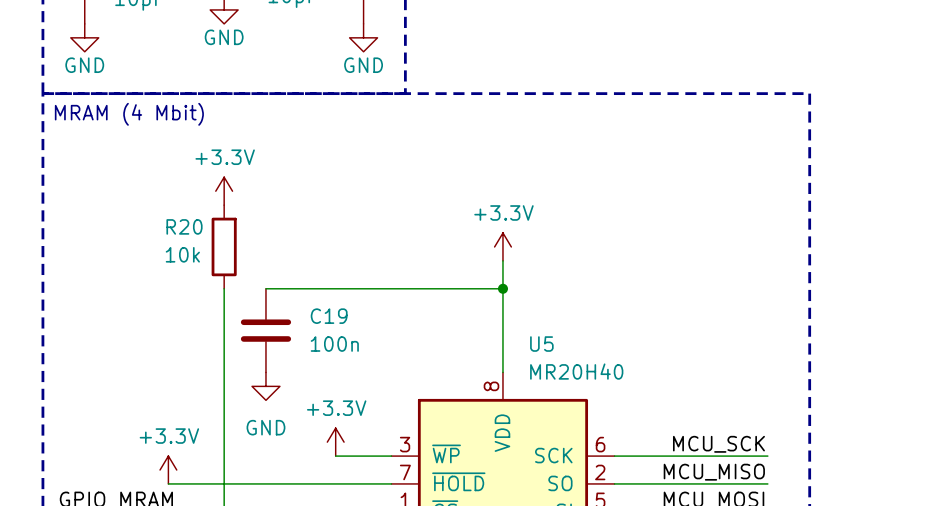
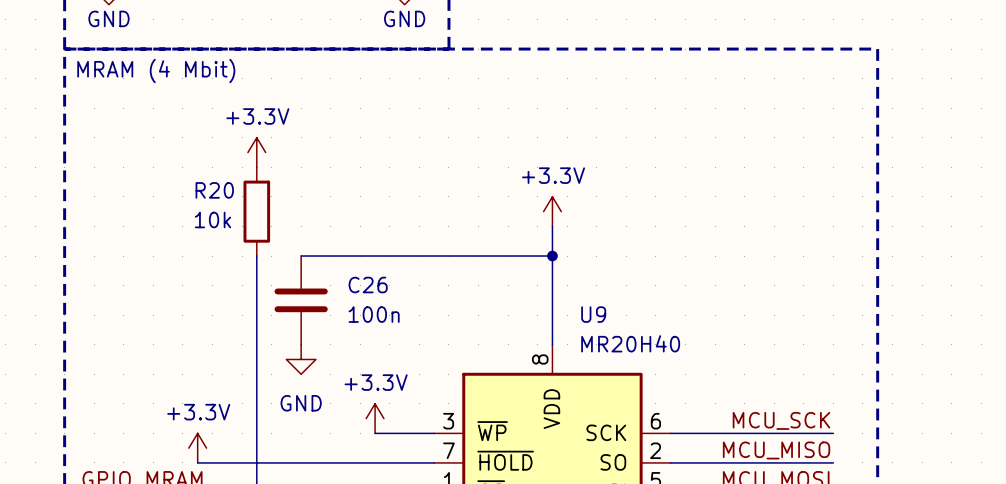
C19 name: C19 (329, 316) -> C26 (368, 285)
U5 name: U5 (541, 344) -> U9 (593, 314)

